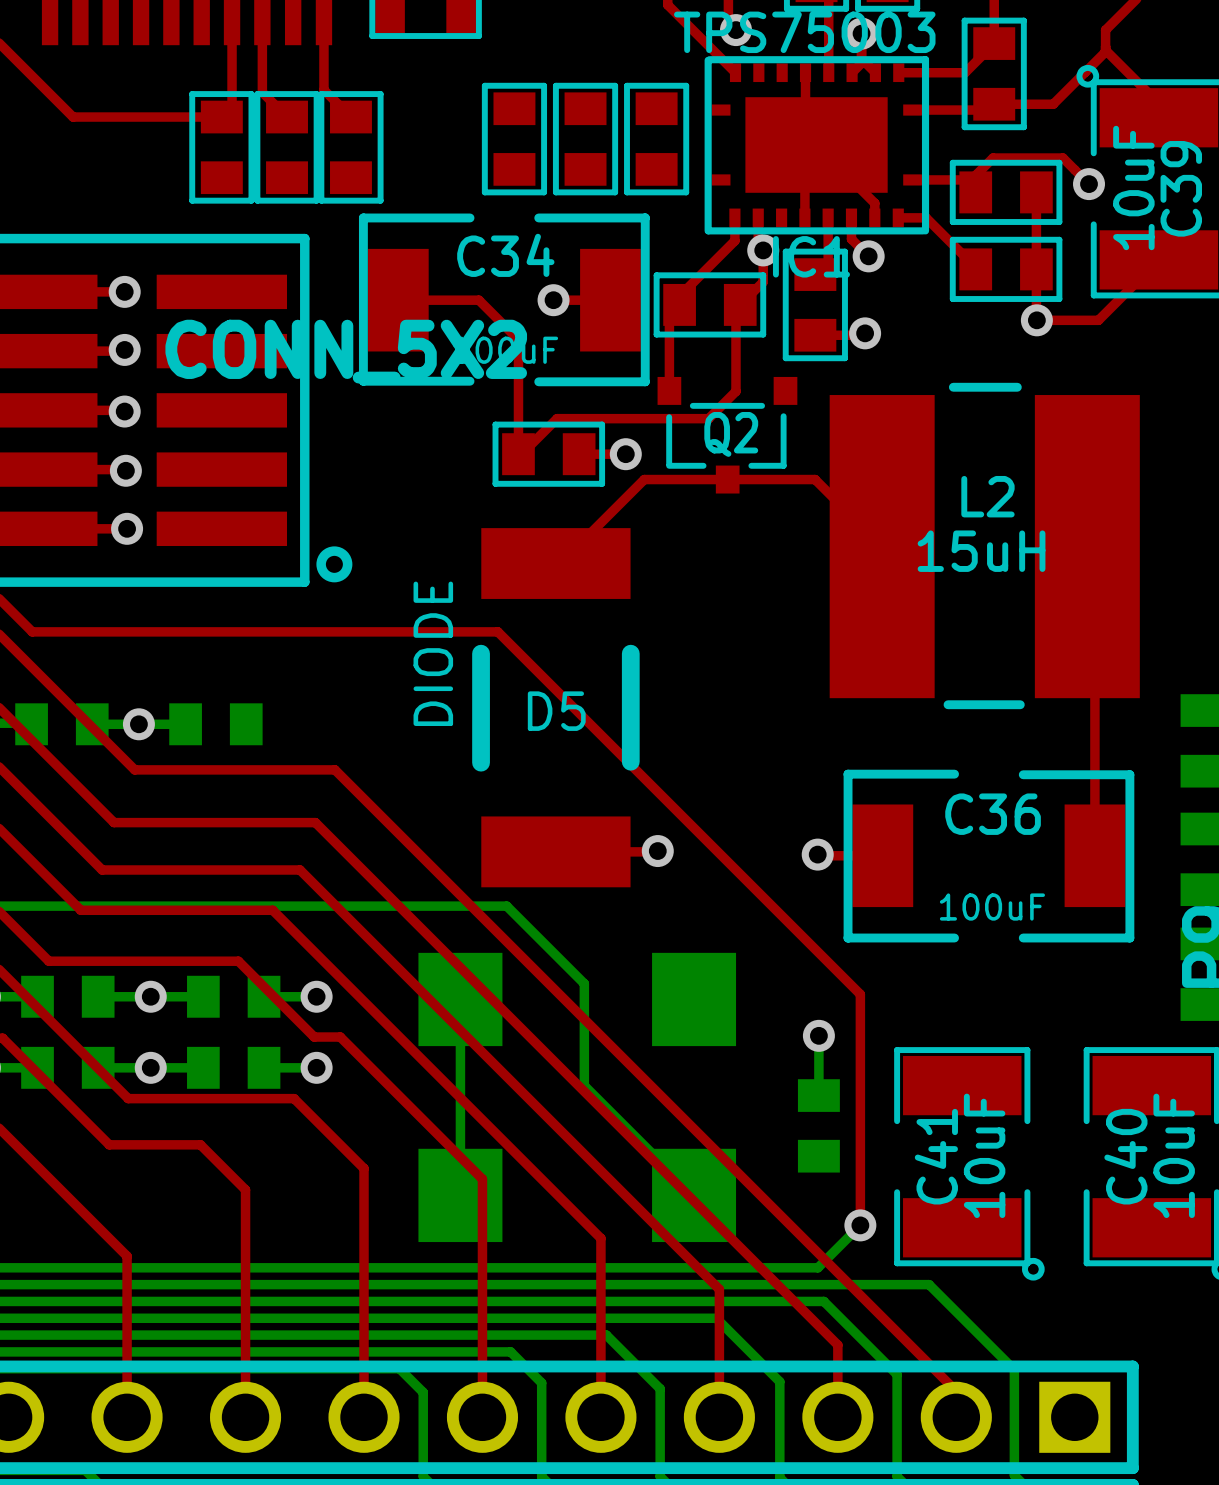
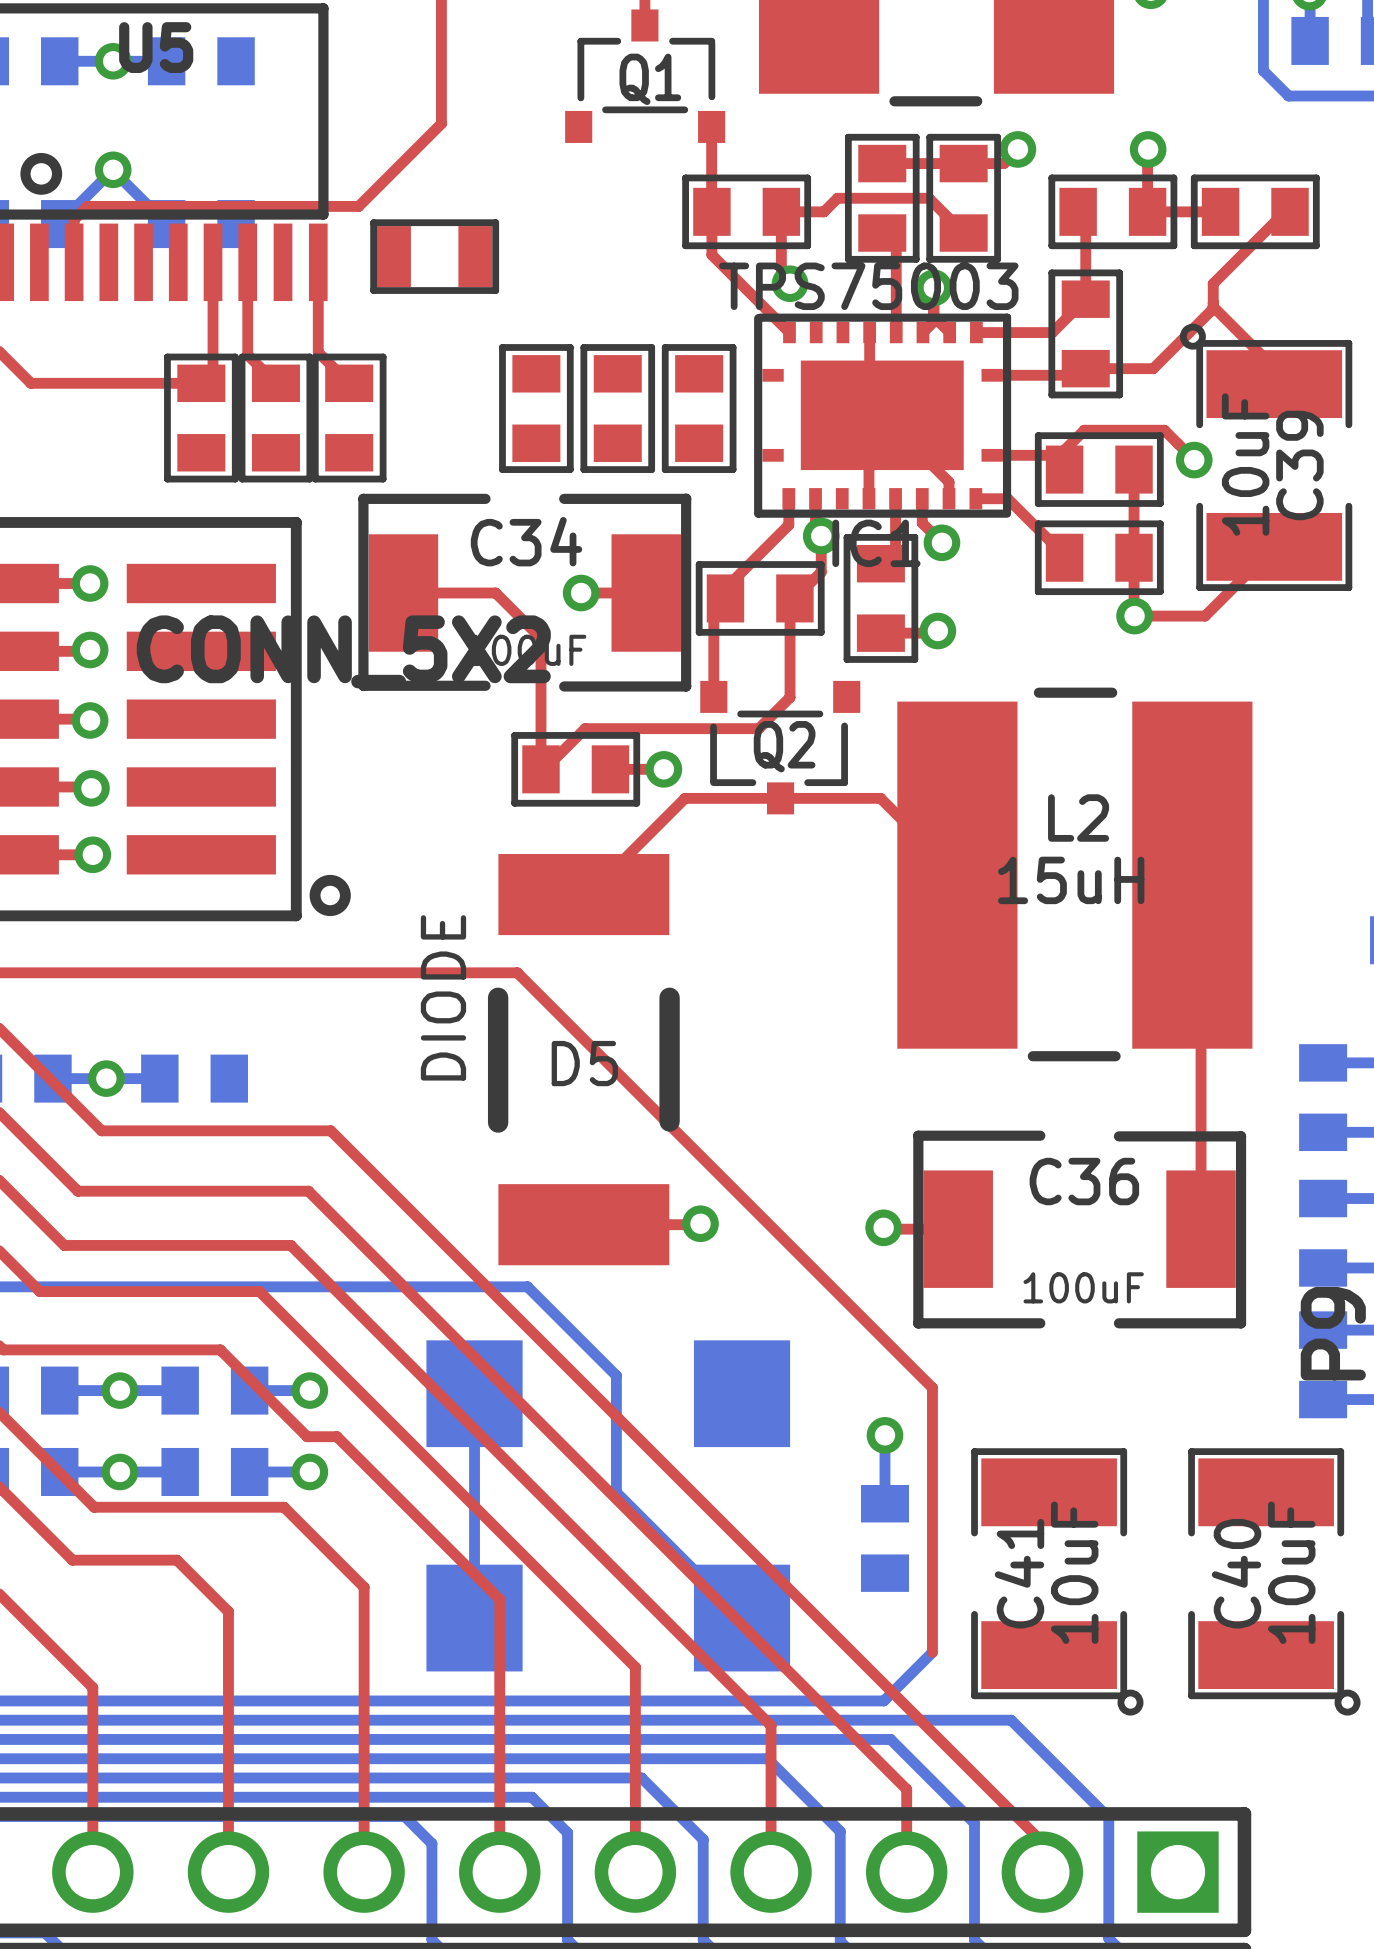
via: (860, 1225) -> none

